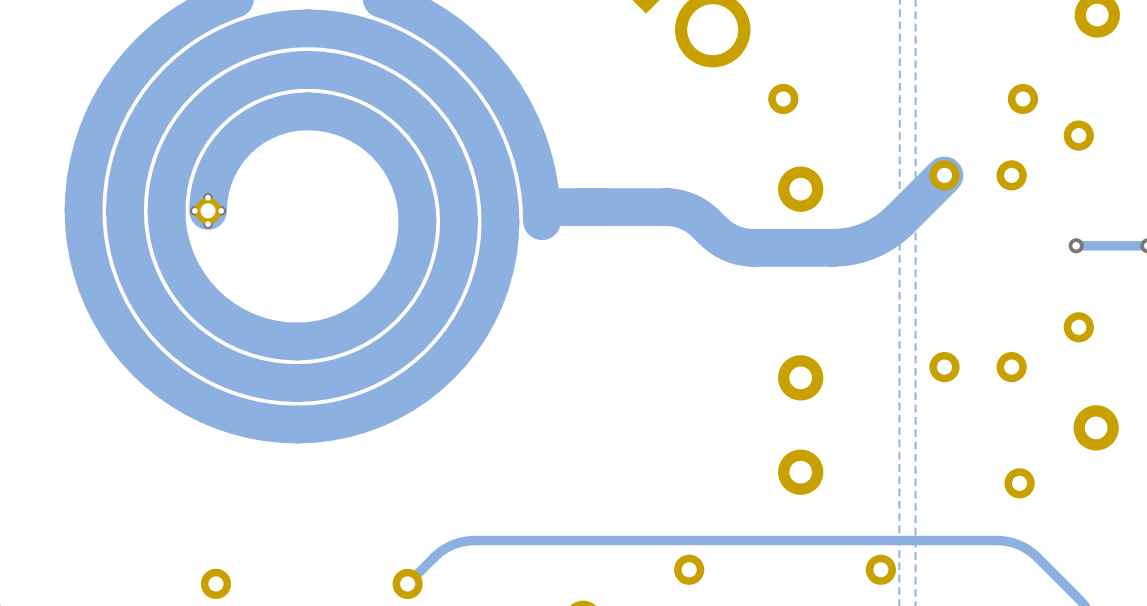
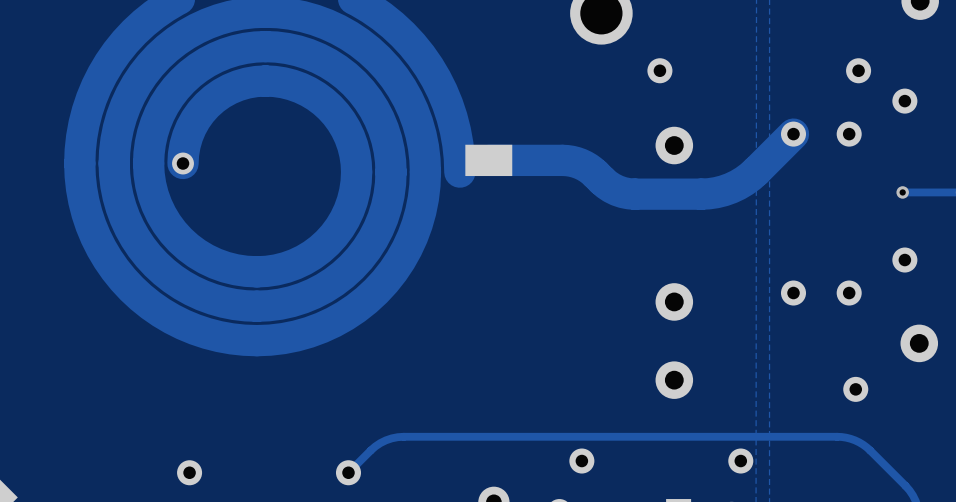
via: (208, 197) -> none
via: (194, 210) -> none
via: (221, 210) -> none
via: (208, 224) -> none

